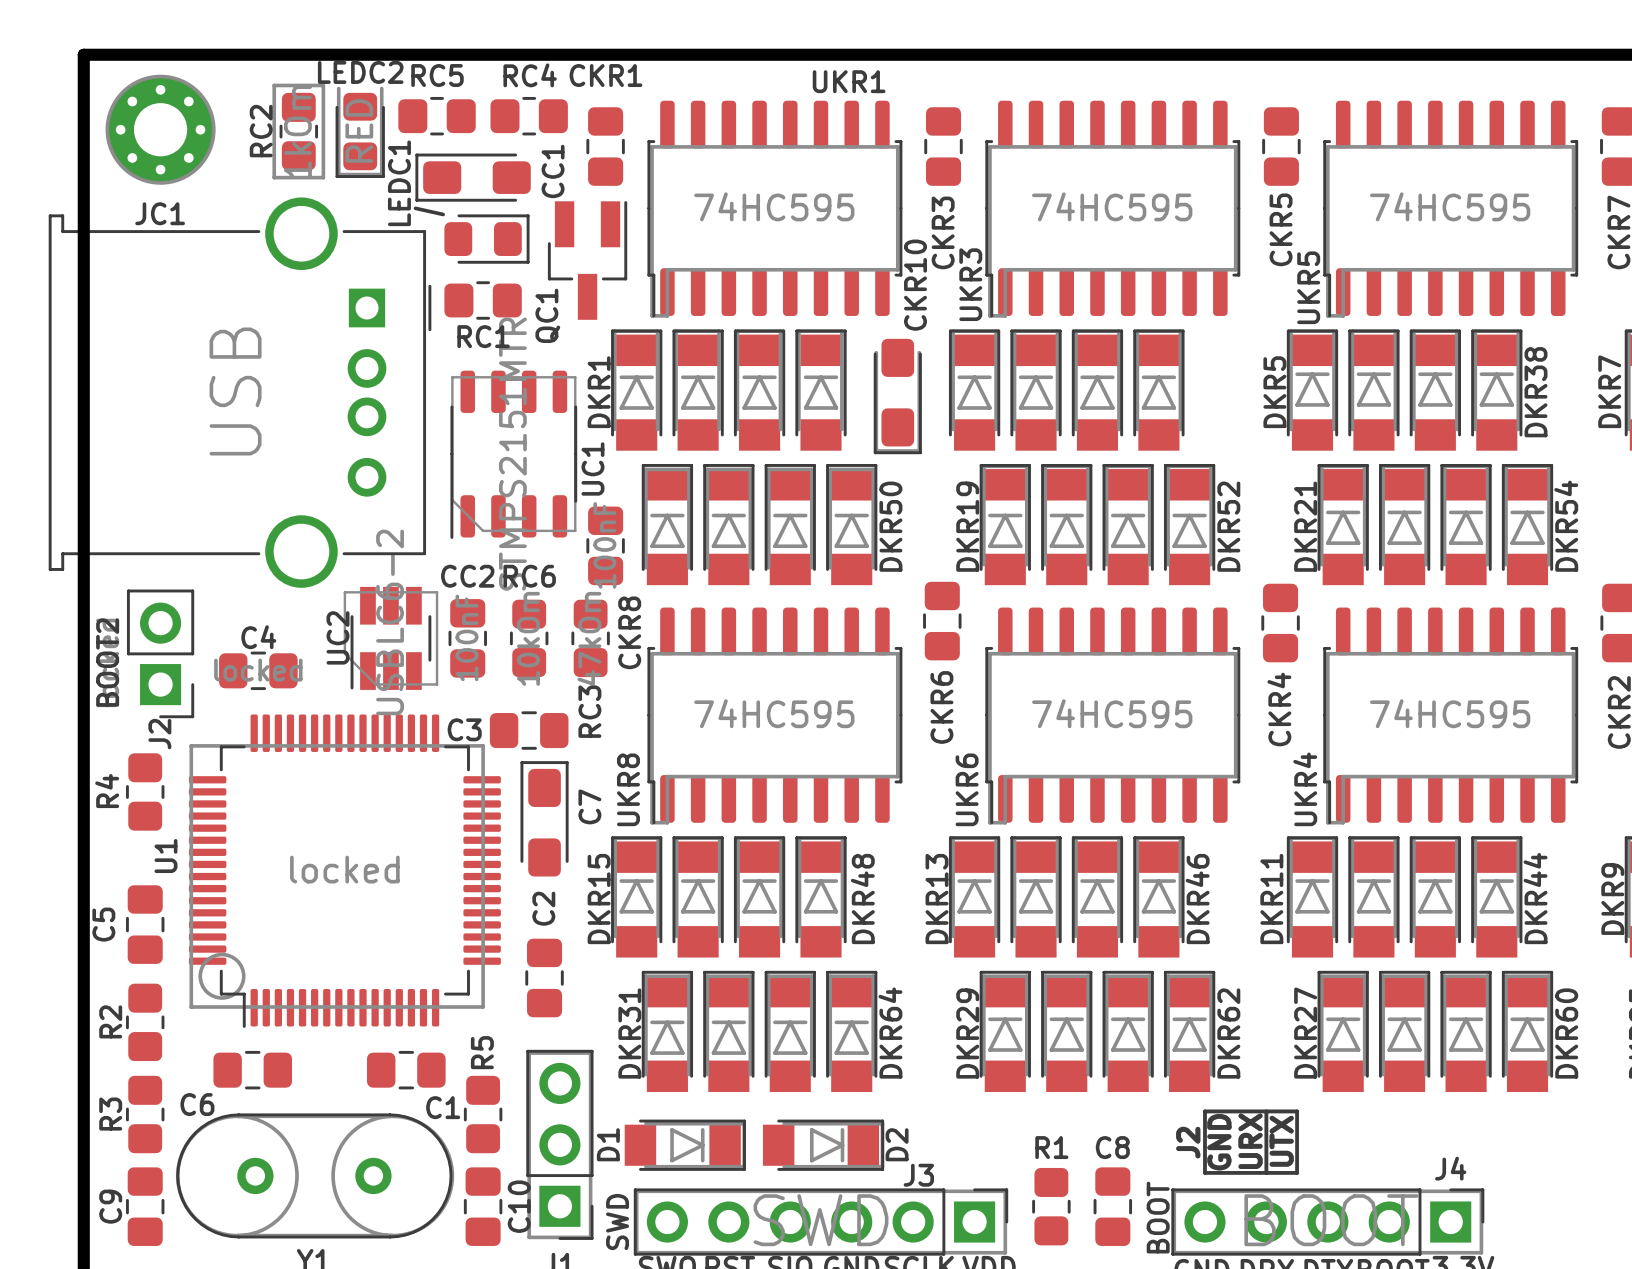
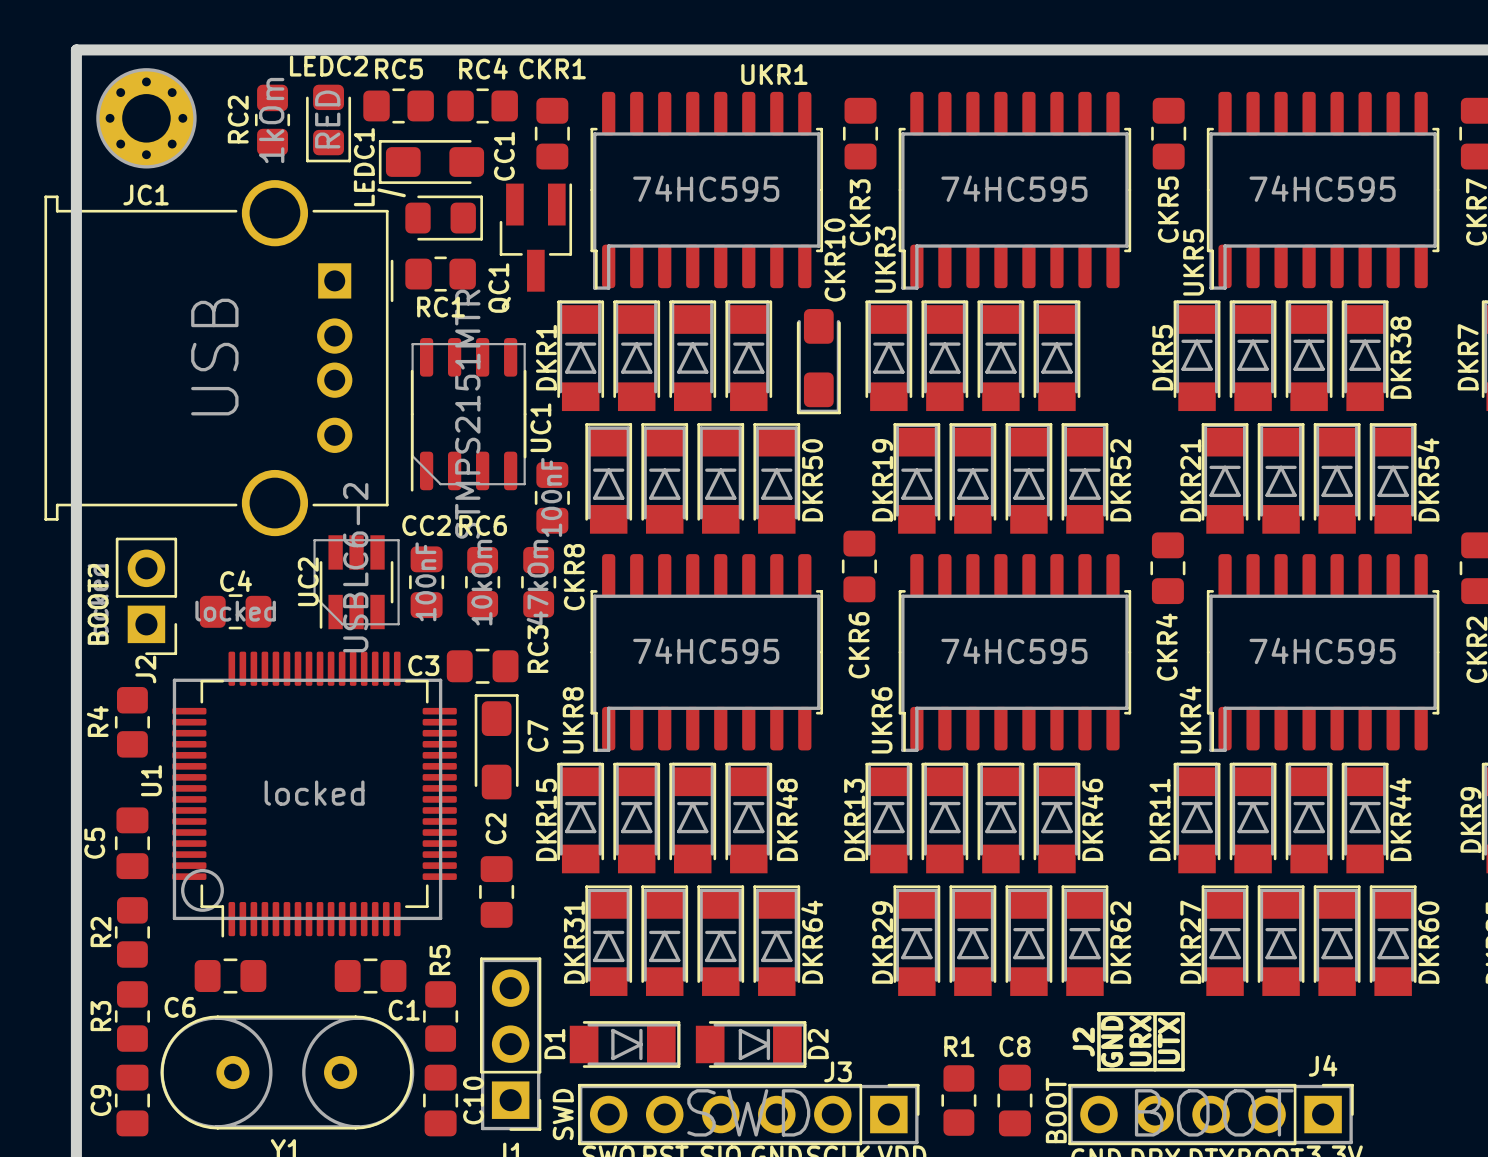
line: (274, 85) (323, 85) (323, 177) (274, 177) (274, 85) -> none
line: (338, 88) (338, 174) (381, 174) (381, 88) -> none

